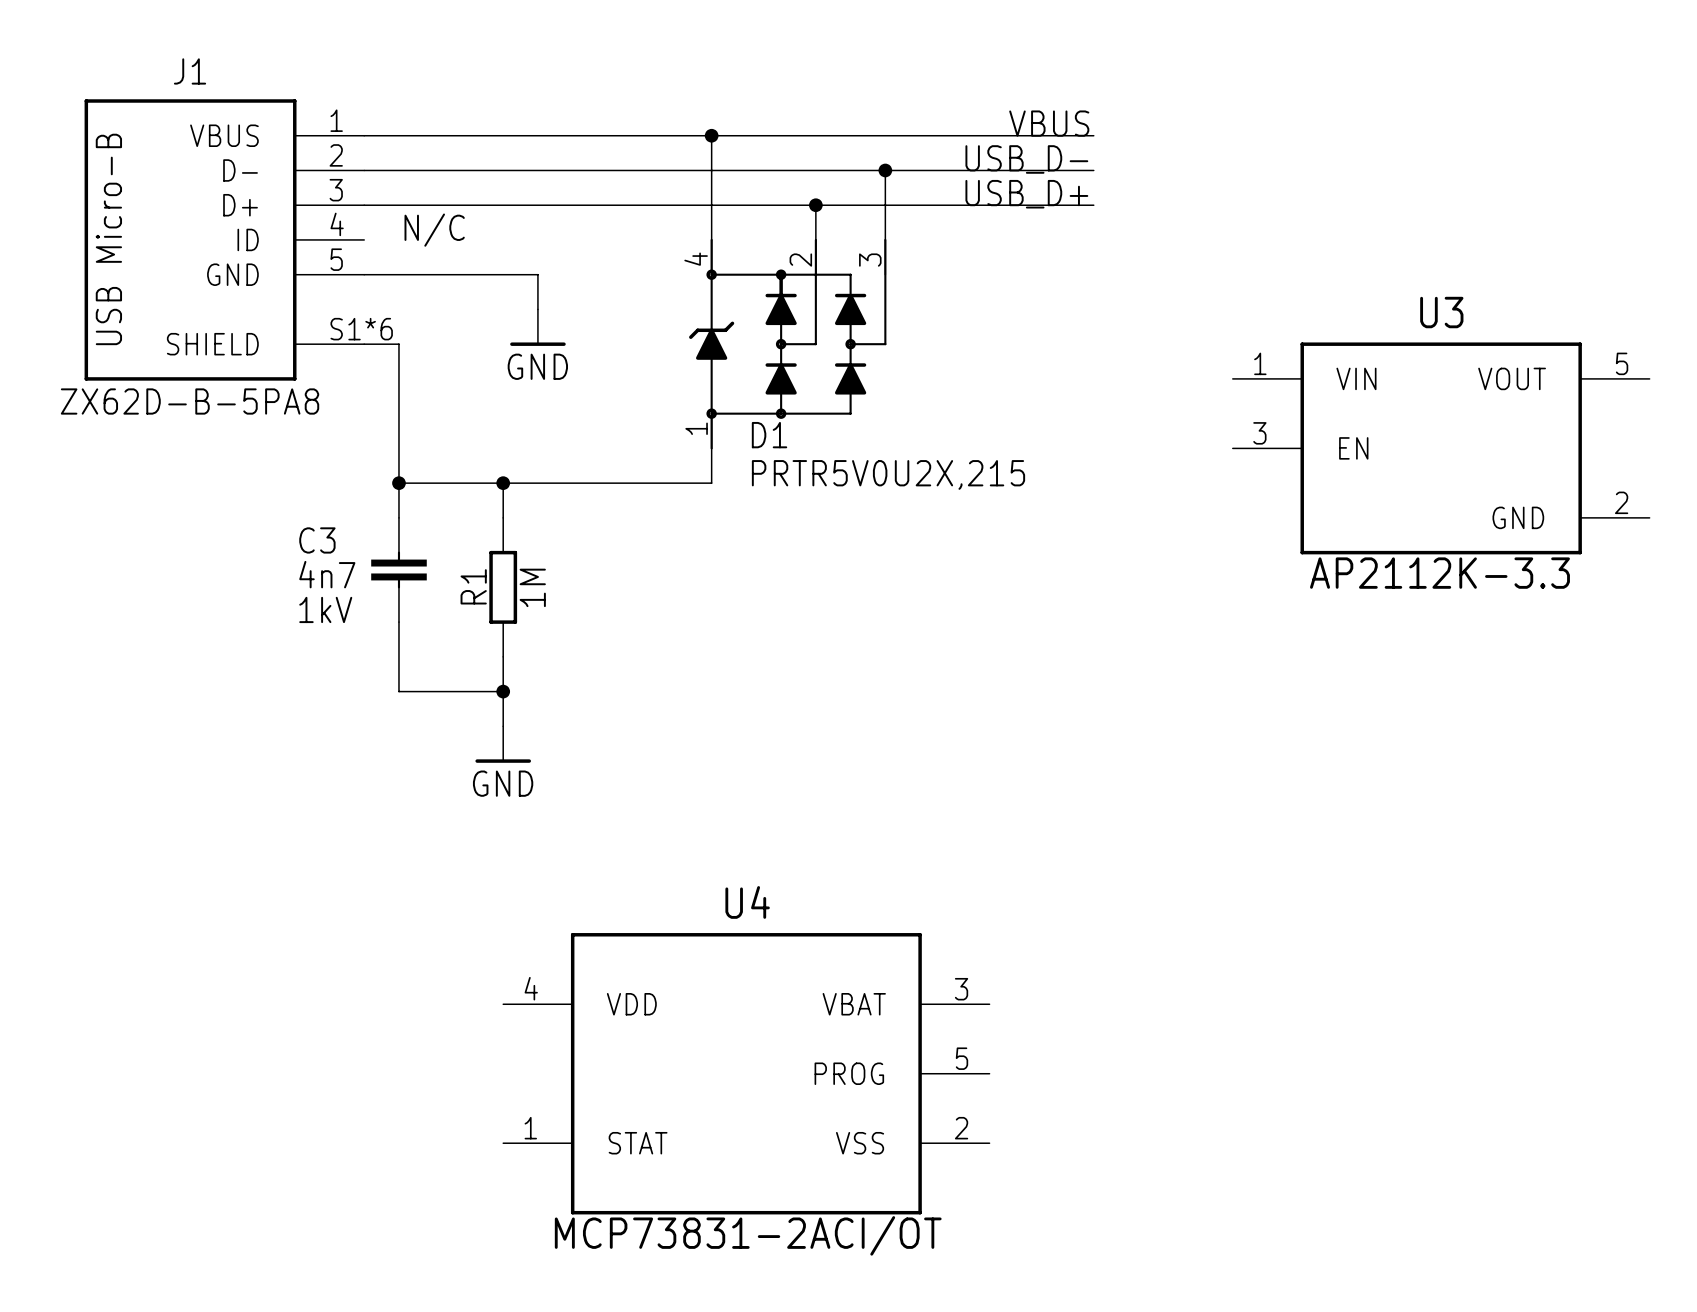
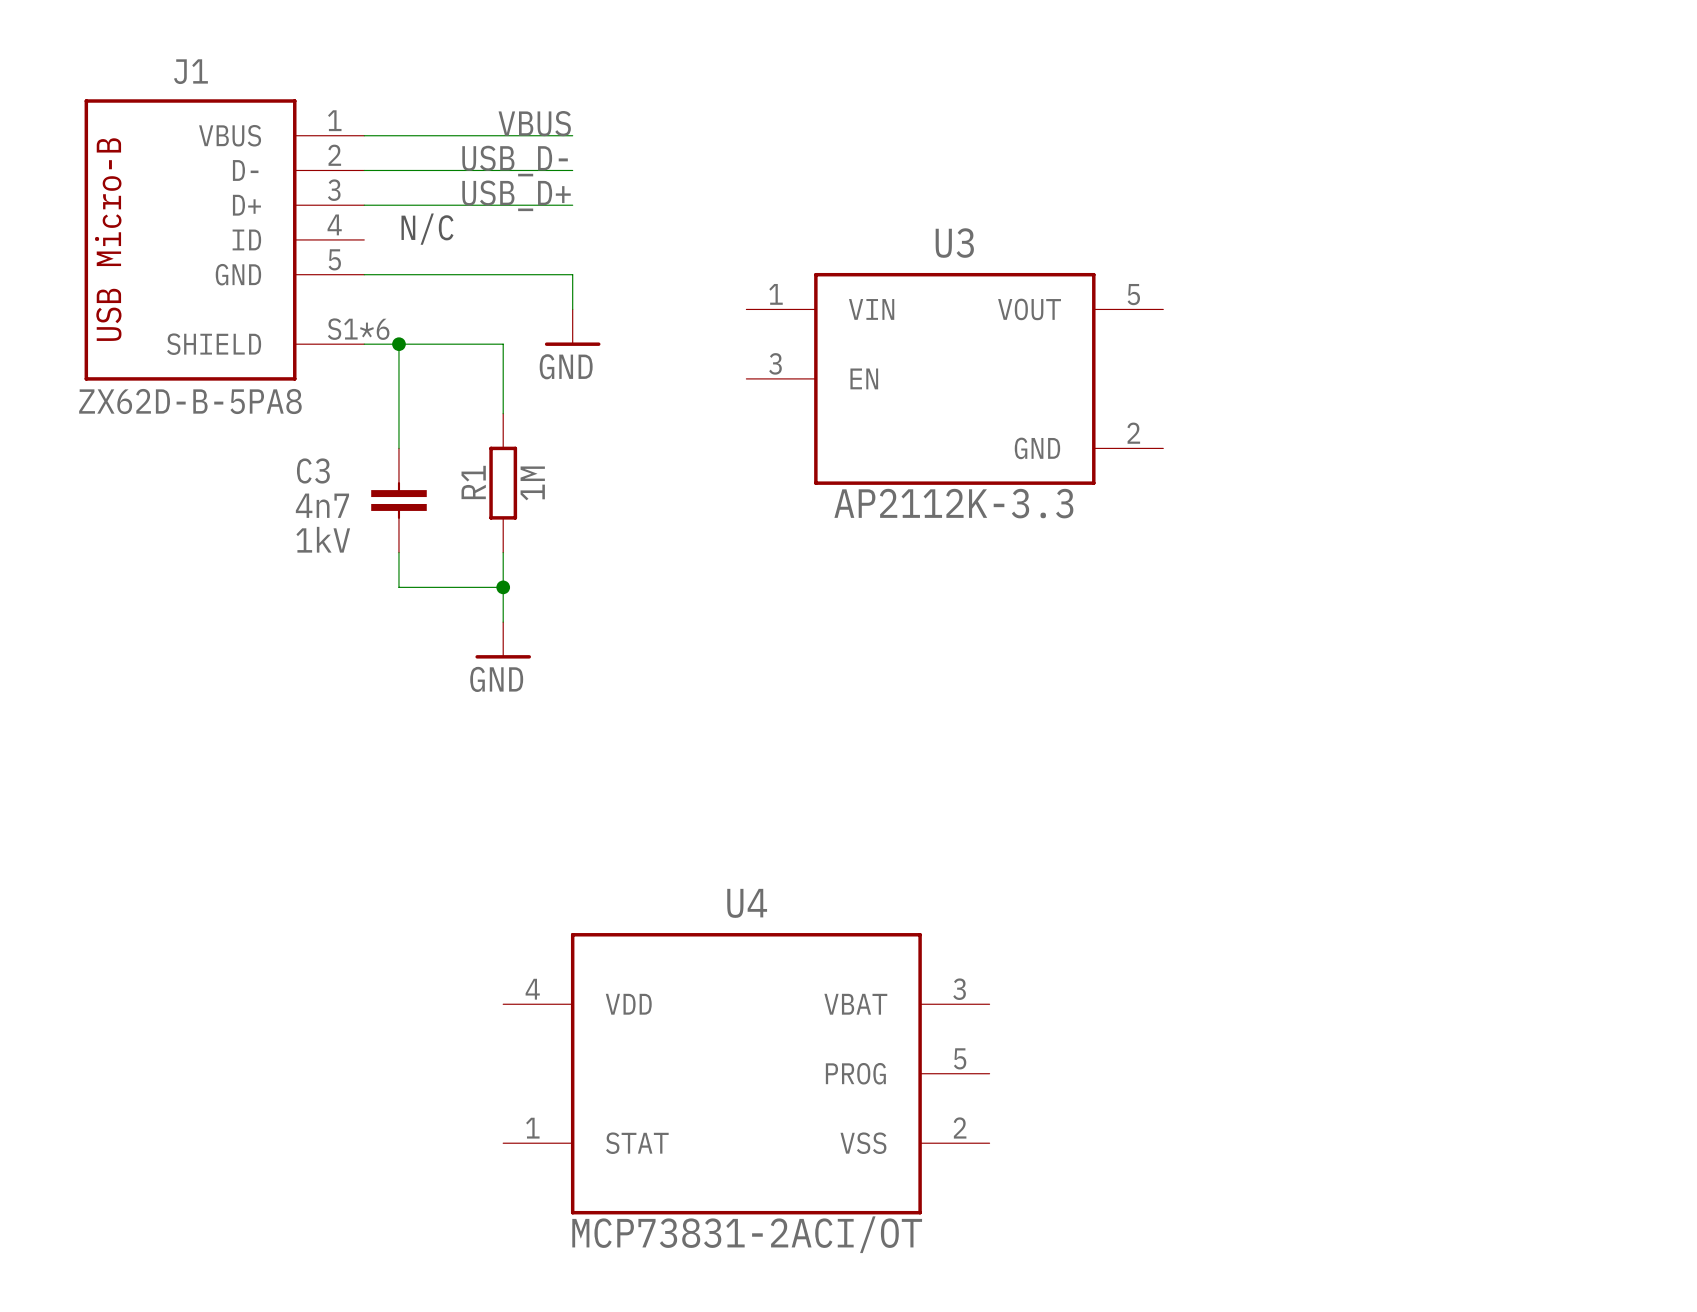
label: none -> VBUS (534, 123)
label: VBUS (1049, 123) -> none
wire: (572, 135) (1093, 135) -> none
wire: (711, 135) (711, 239) -> none
junction: (711, 135) -> none
label: none -> USB_D- (515, 161)
label: USB_D- (1026, 159) -> none
wire: (572, 170) (1093, 170) -> none
wire: (885, 170) (885, 239) -> none
junction: (885, 170) -> none
label: none -> USB_D+ (516, 195)
label: USB_D+ (1026, 194) -> none
wire: (572, 205) (1093, 205) -> none
wire: (815, 205) (815, 239) -> none
junction: (815, 205) -> none
wire: (537, 274) (537, 309) -> (537, 274) (572, 274) (572, 309)
power symbol position: GND (537, 327) -> GND (572, 327)
wire: none -> (398, 344) (503, 344) (503, 413)
junction: none -> (398, 344)
D1: PRTR5V0U2X,215 (787, 344) -> none
wire: (711, 448) (711, 483) (398, 483) -> none
U3 position: (1441, 448) -> (954, 378)
junction: (398, 483) -> none
wire: (503, 483) (503, 517) -> none
junction: (503, 483) -> none
wire: none -> (398, 552) (398, 587) (503, 587)
C3 position: (398, 569) -> (398, 500)
R1 position: (503, 587) -> (503, 483)
junction: none -> (503, 587)
wire: (398, 622) (398, 691) (503, 691) -> none
wire: (503, 656) (503, 726) -> (503, 552) (503, 622)
junction: (503, 691) -> none
power symbol position: GND (503, 744) -> GND (503, 640)

